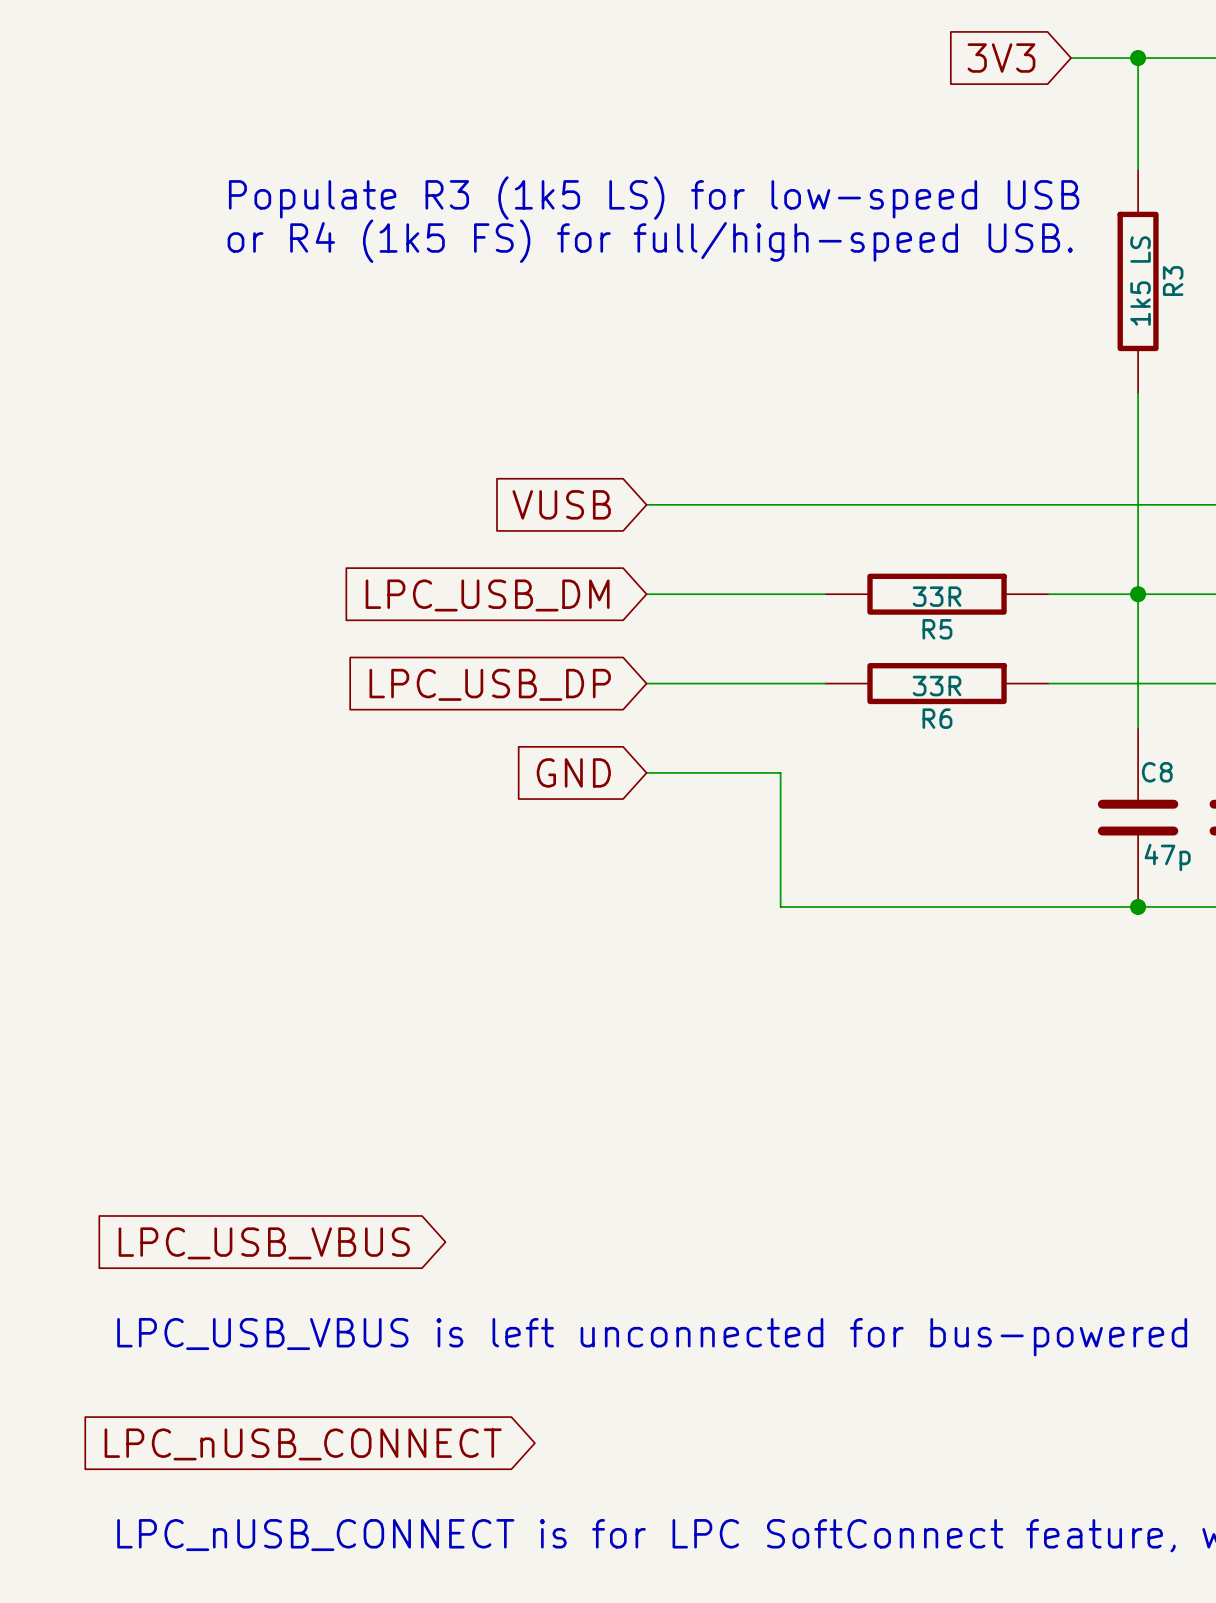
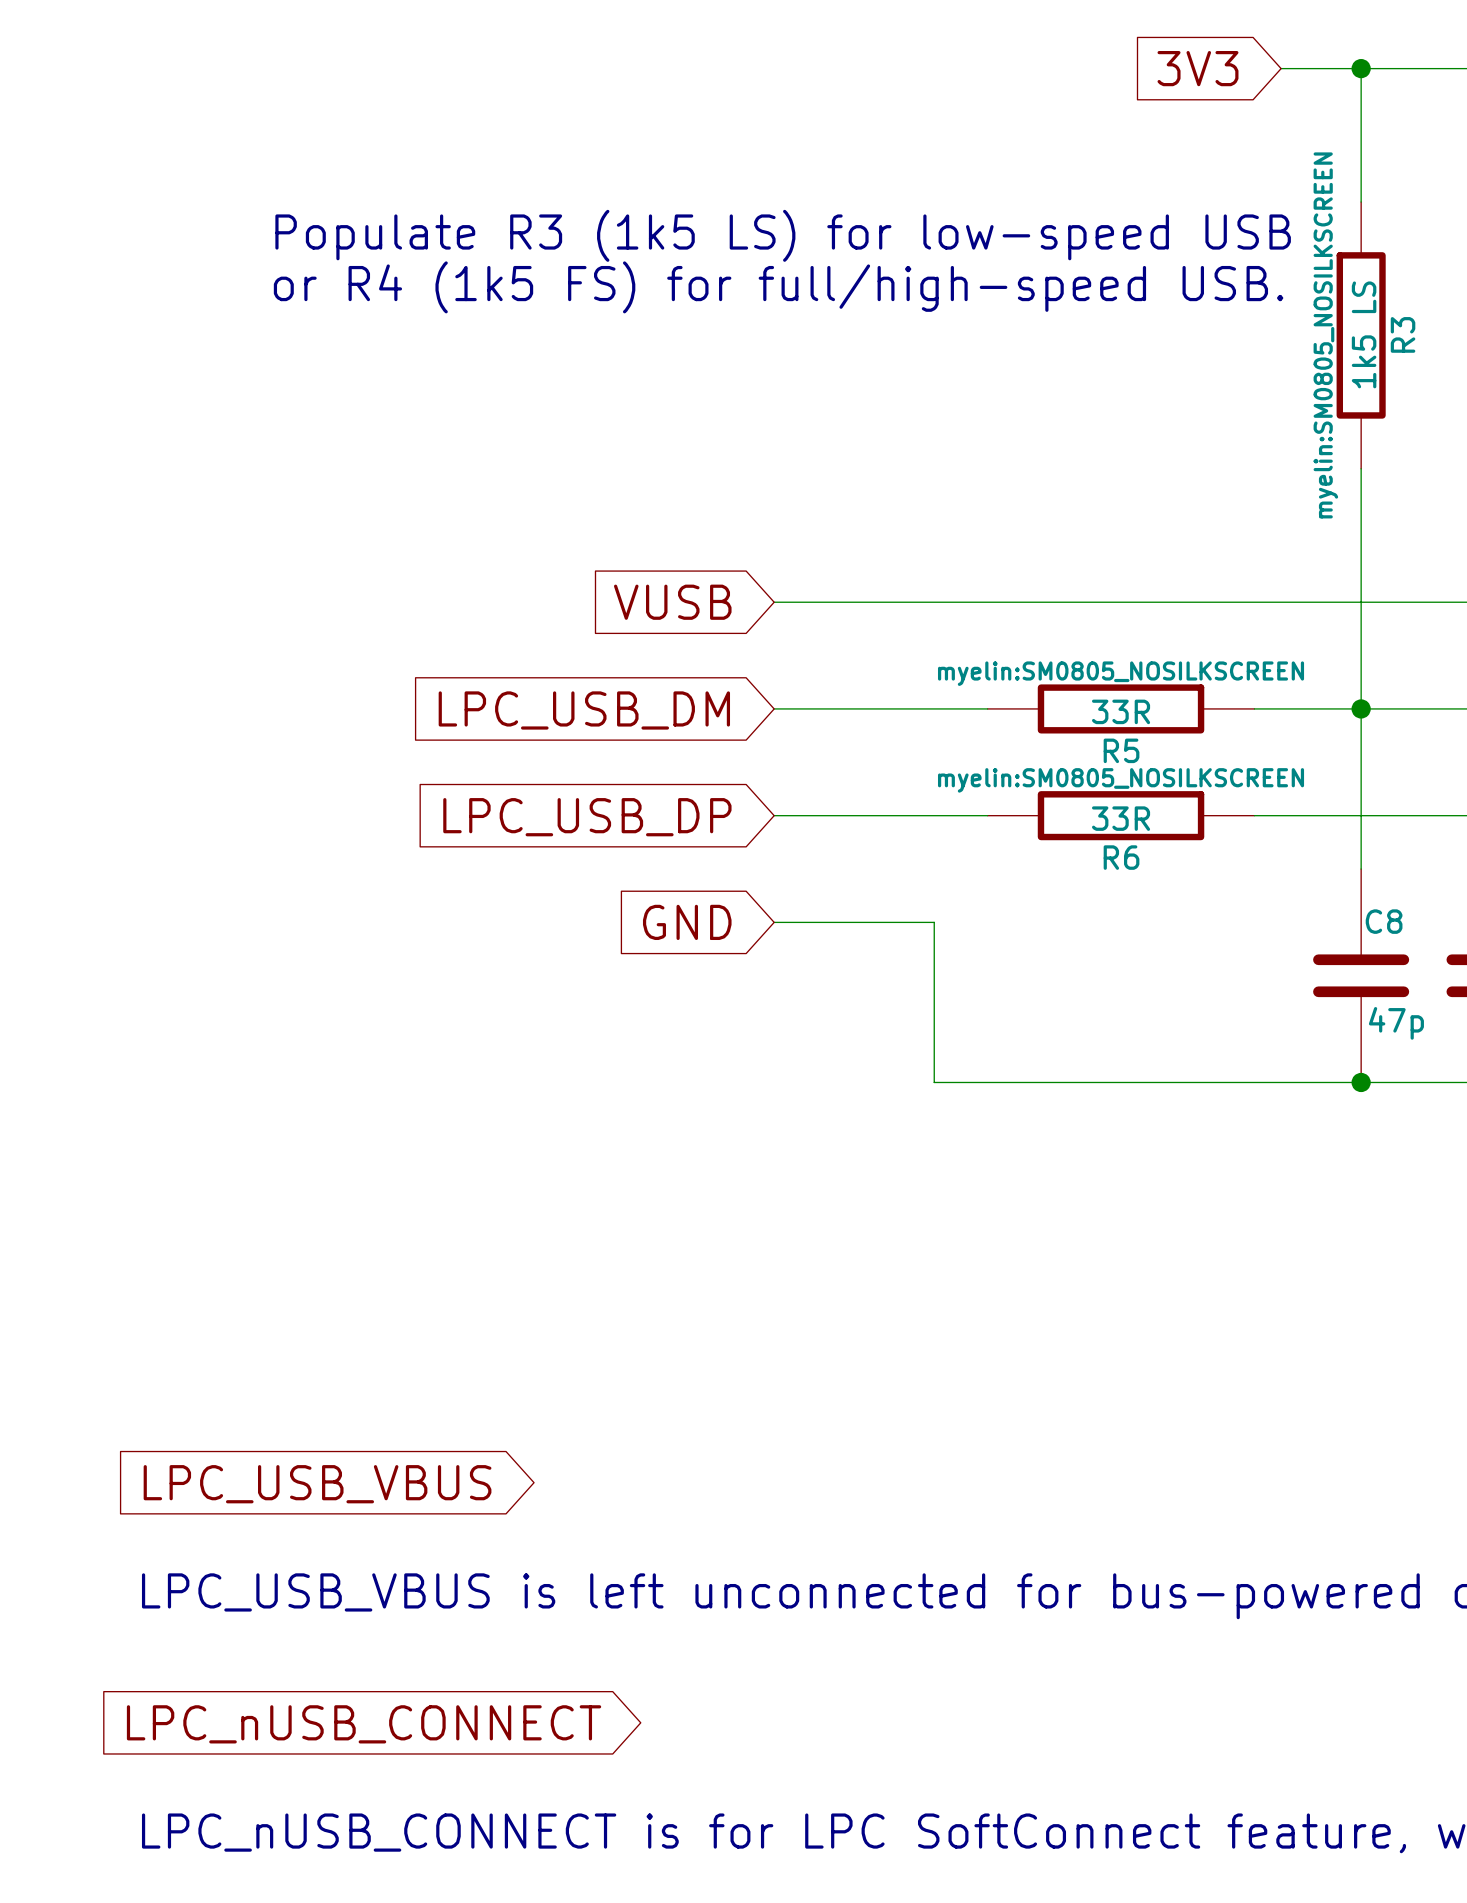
R3 text: none -> myelin:SM0805_NOSILKSCREEN (1325, 335)
R5 text: none -> myelin:SM0805_NOSILKSCREEN (1121, 673)
R6 text: none -> myelin:SM0805_NOSILKSCREEN (1121, 780)

